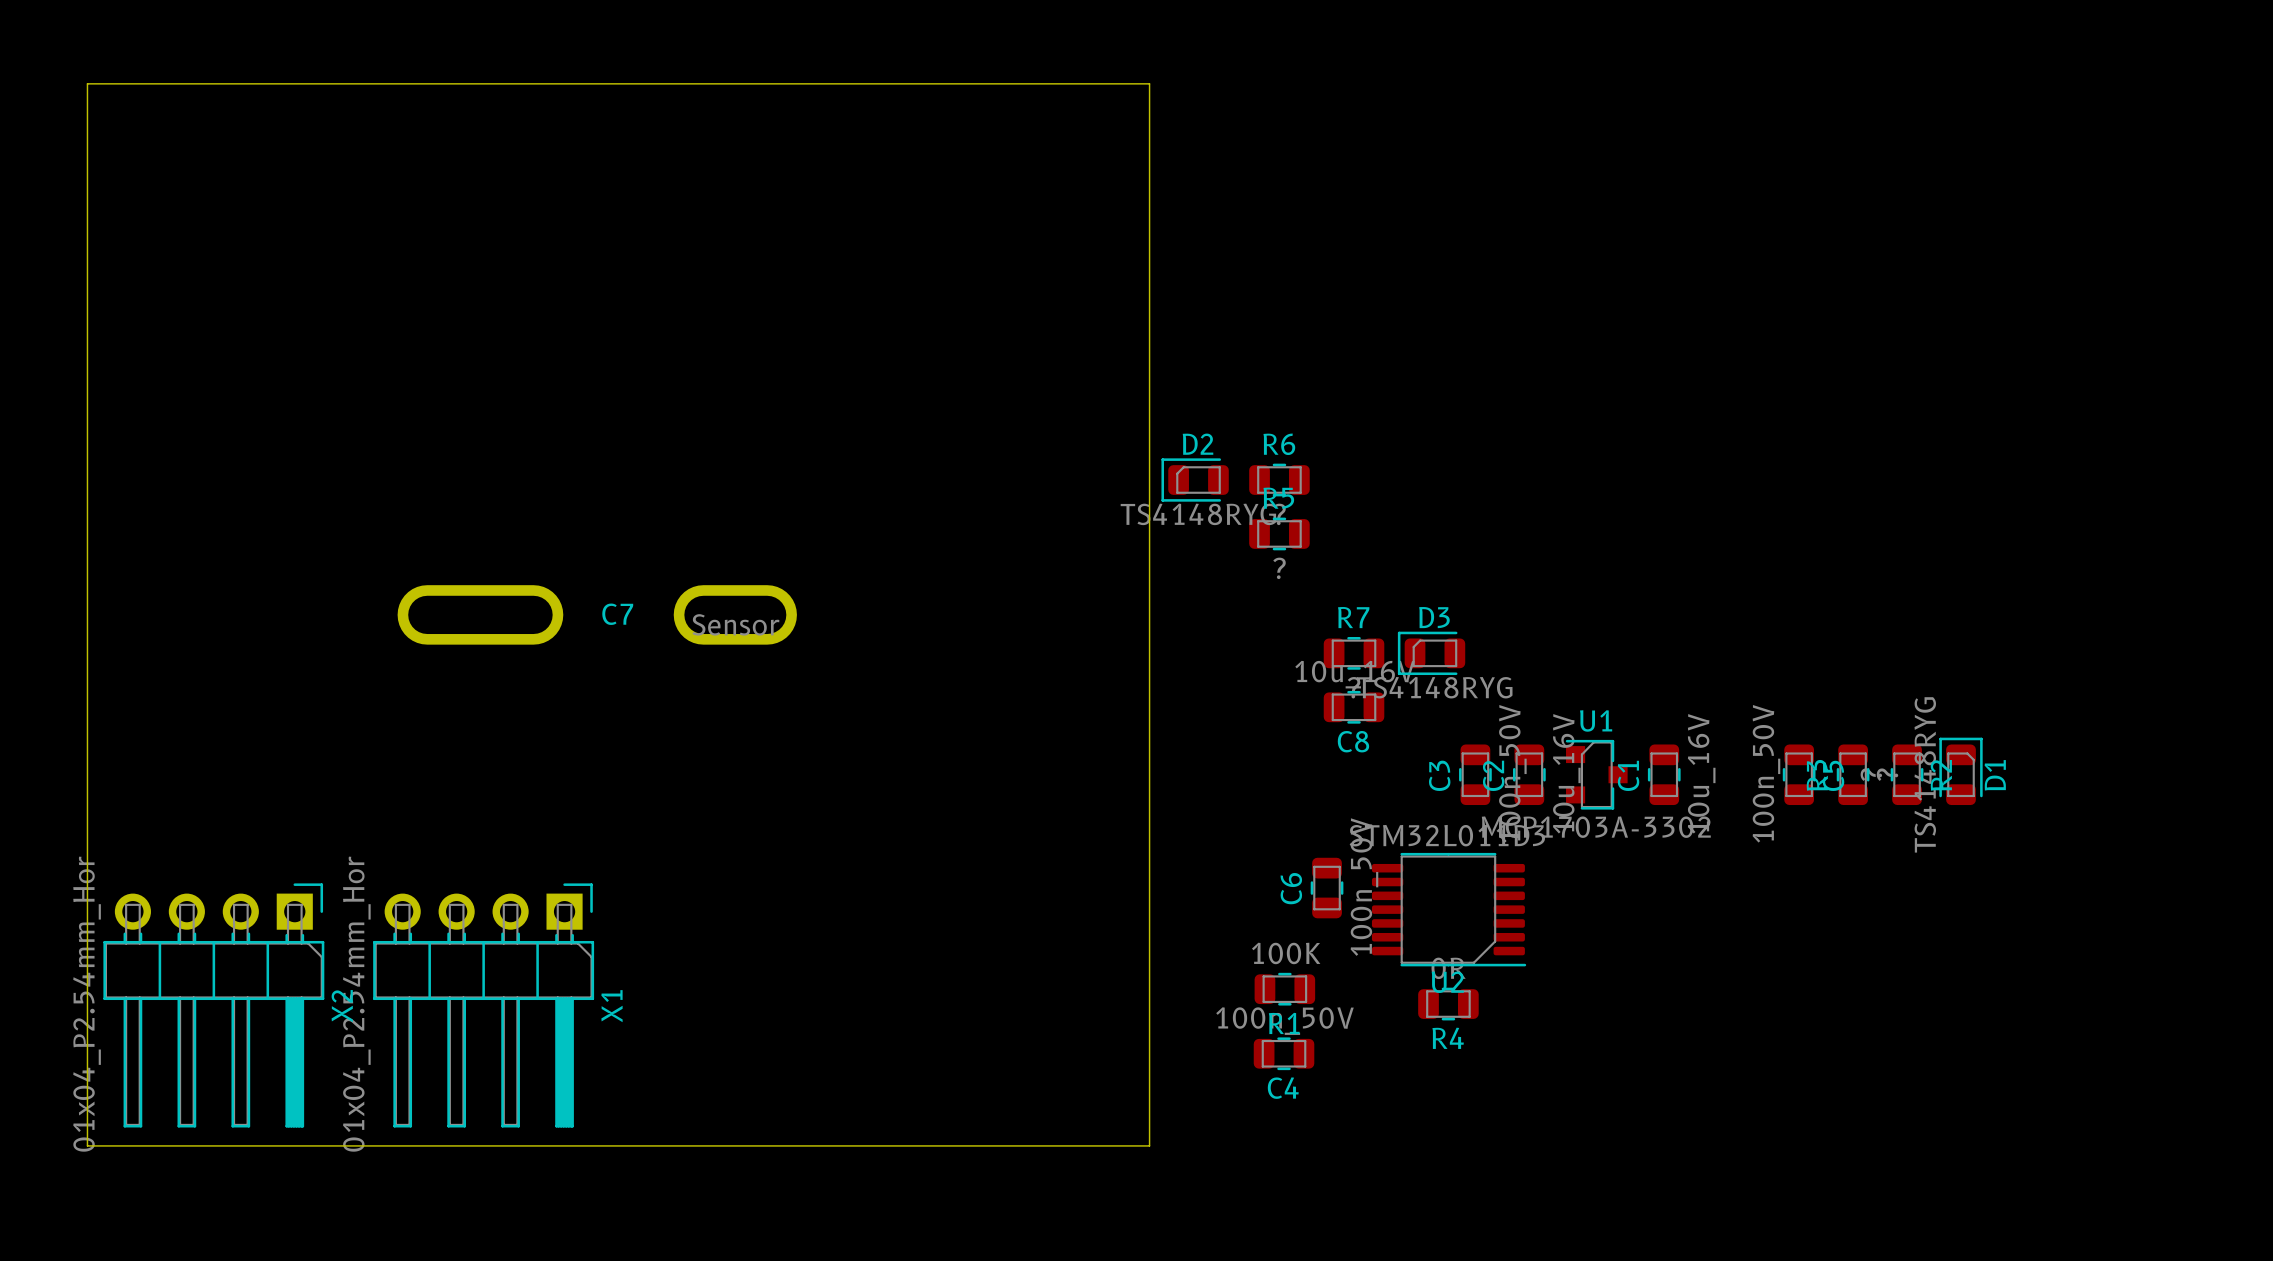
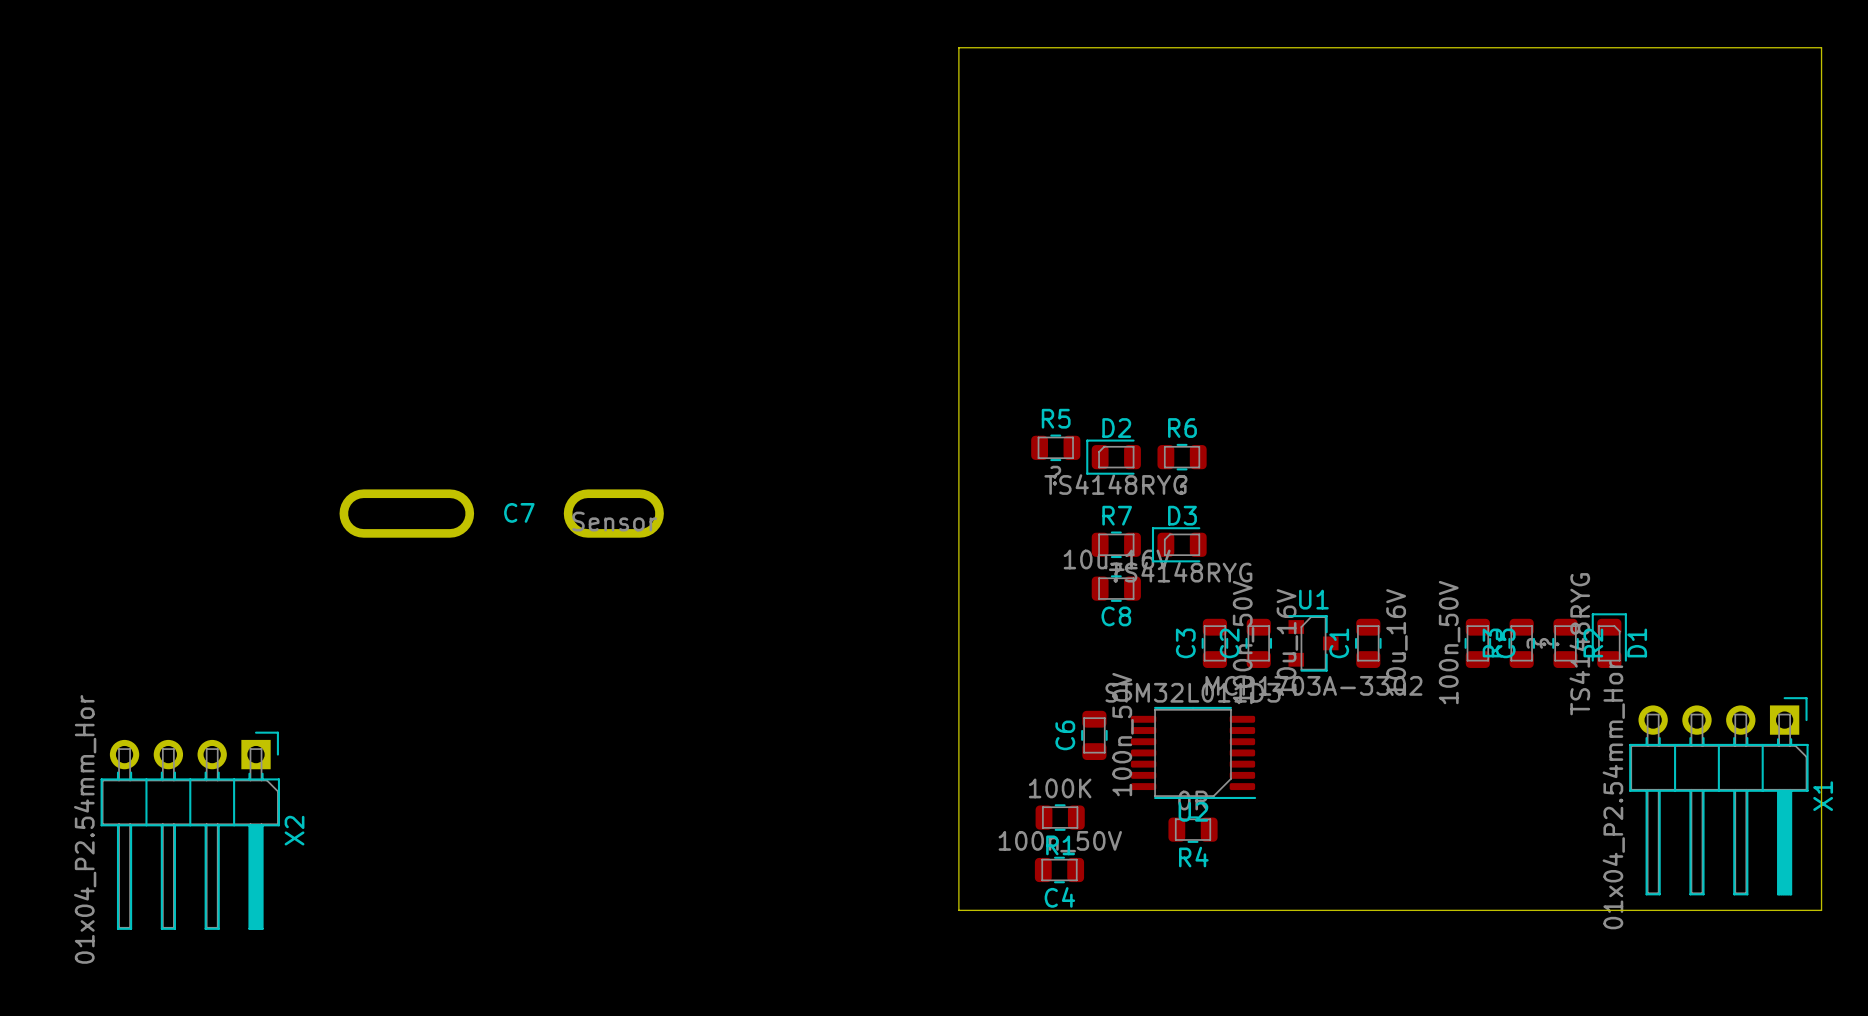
board edge: none -> (958, 47) (958, 910) (1821, 910) (1821, 47) (958, 47)
board edge: (87, 83) (87, 1145) (1149, 1145) (1149, 83) (87, 83) -> none
D2 position: (1195, 480) -> (1113, 457)
R6 position: (1279, 480) -> (1182, 457)
X1 position: (483, 1005) -> (1718, 796)

